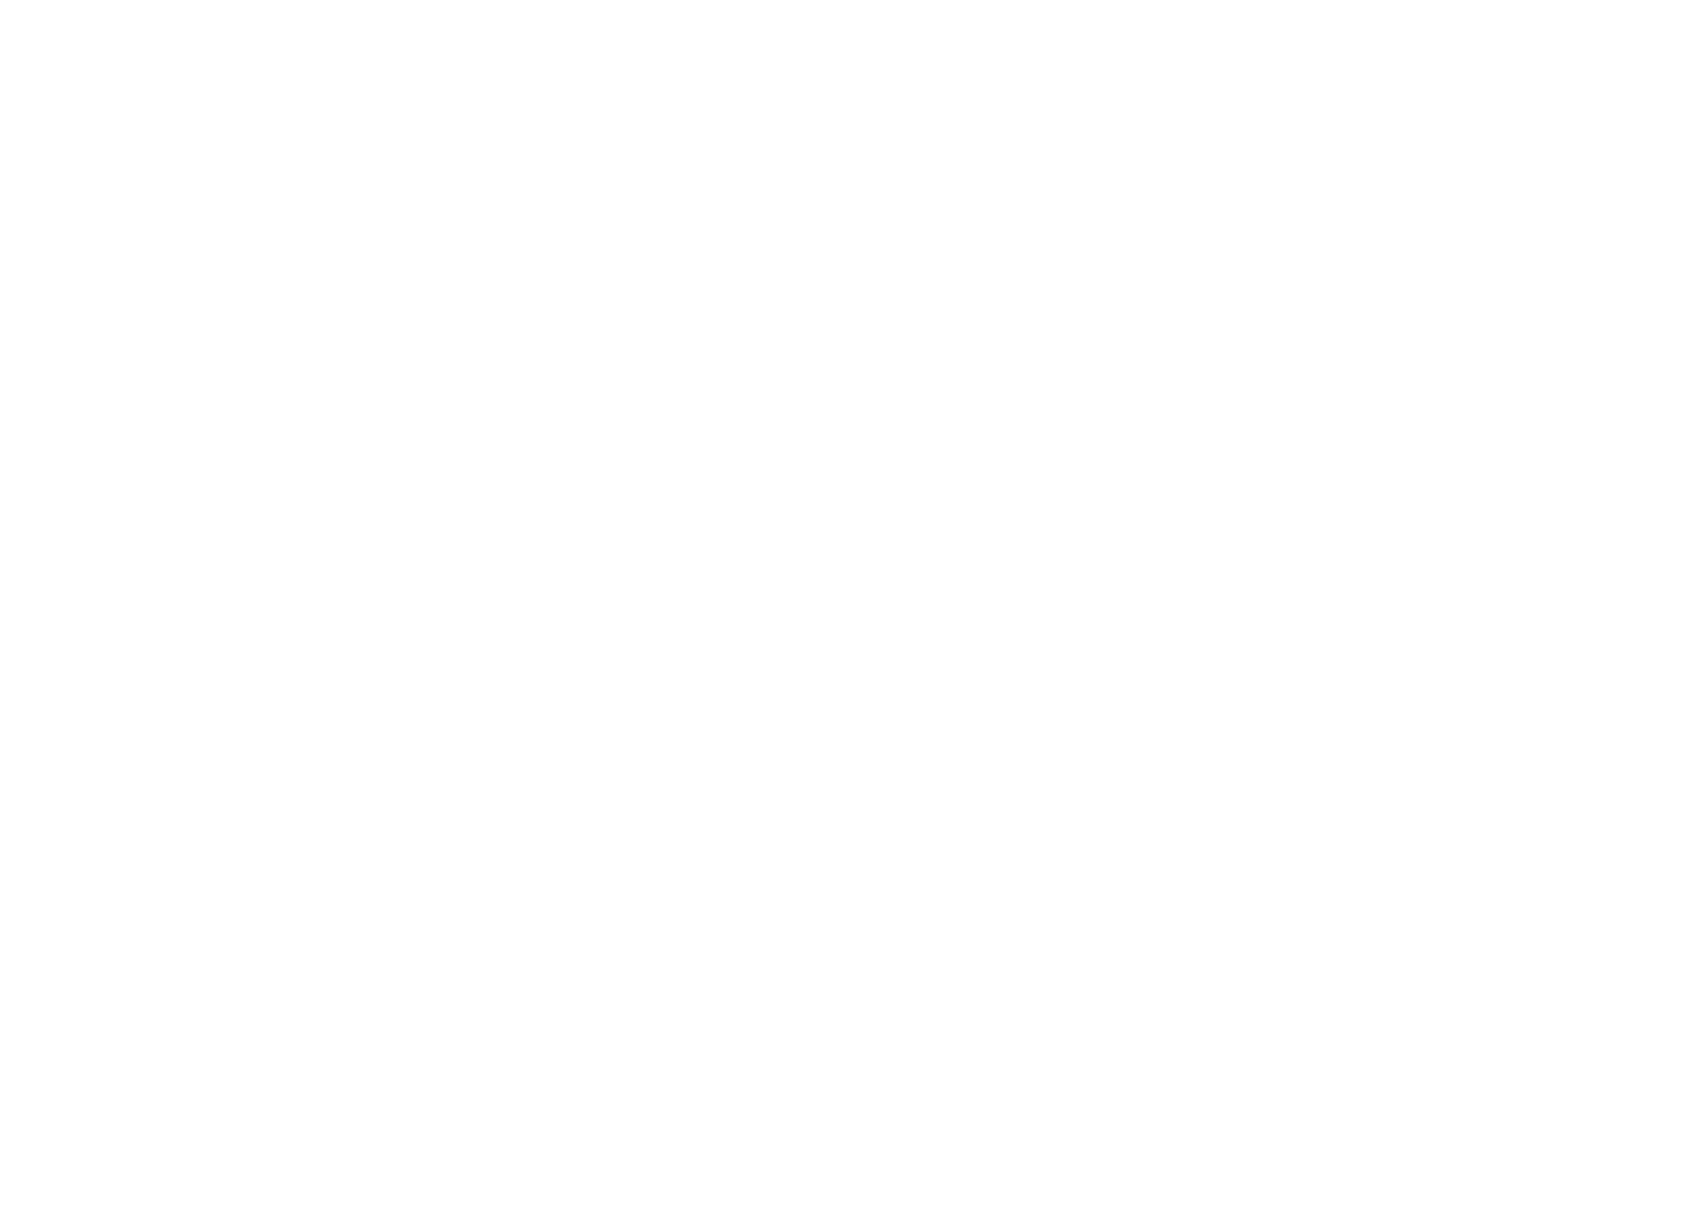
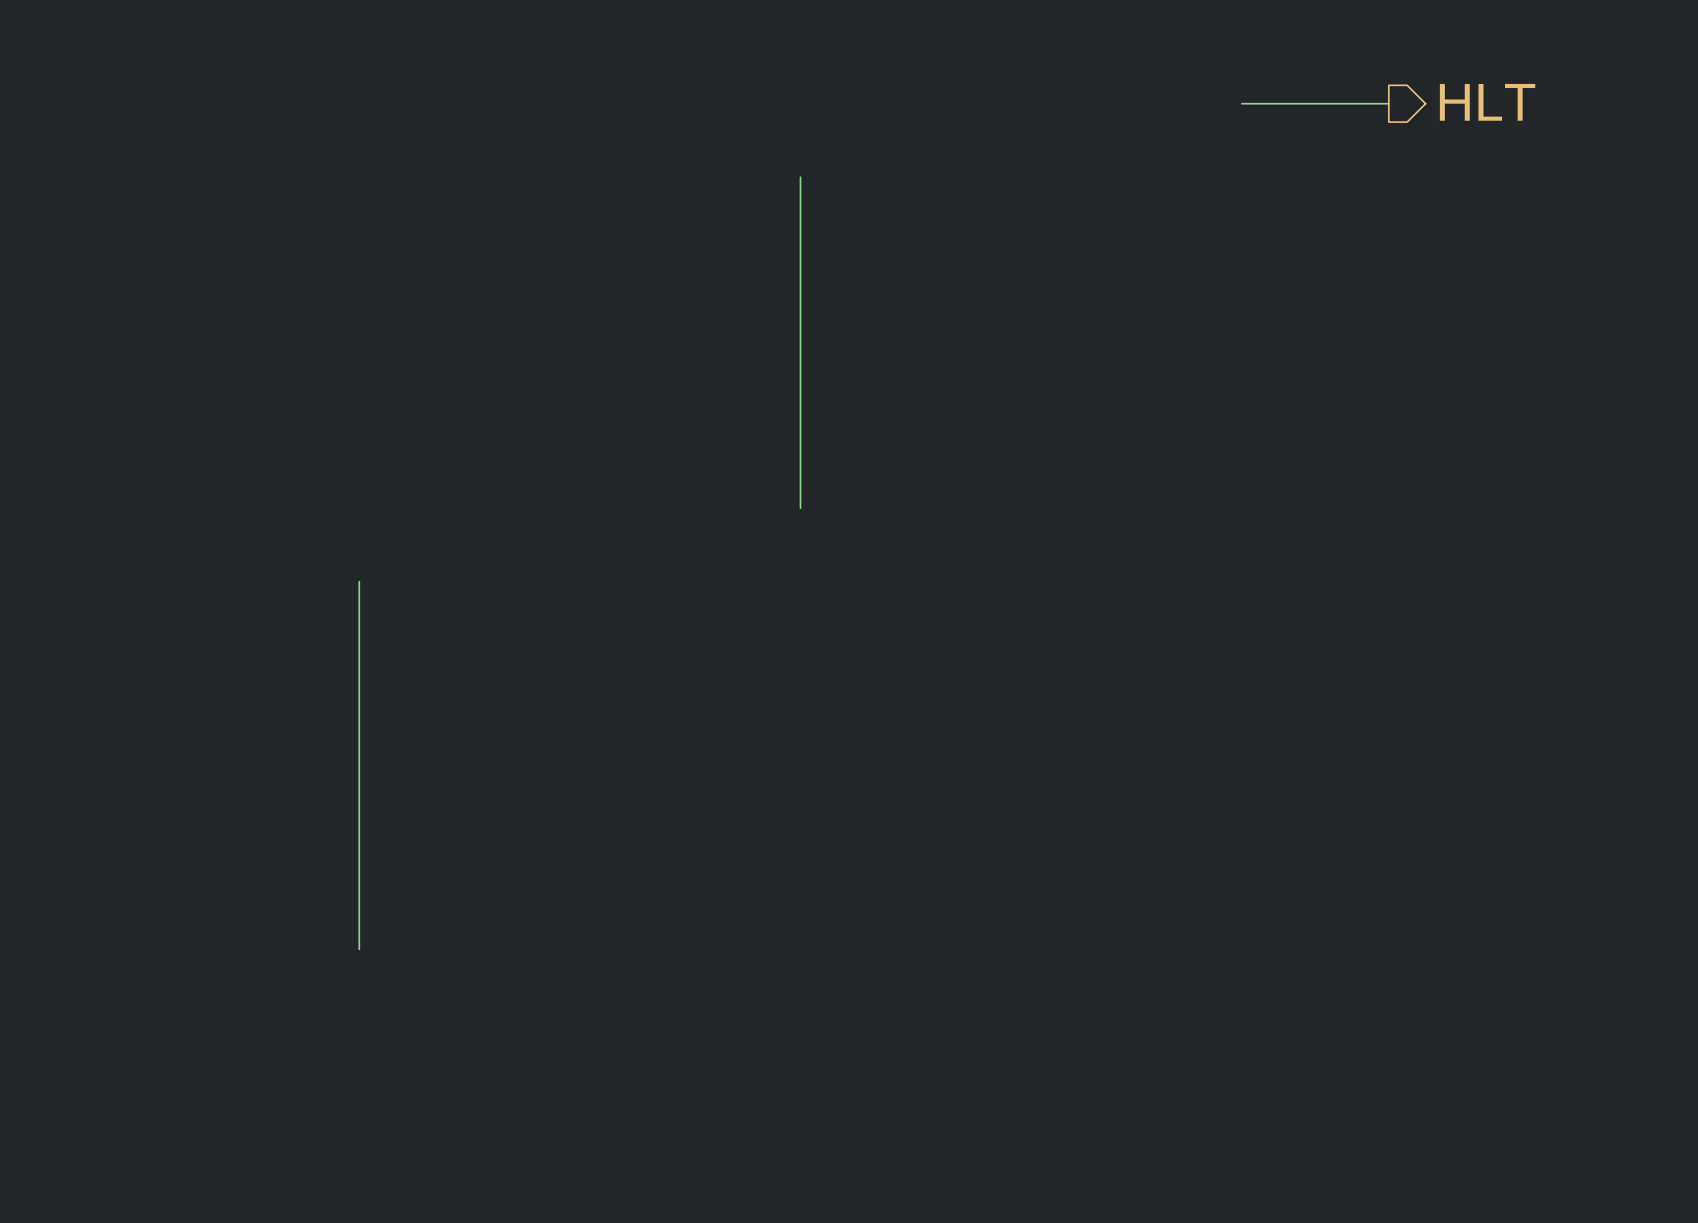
hierarchical label: none -> HLT (1487, 102)
wire: none -> (1241, 103) (1388, 103)
wire: none -> (800, 177) (800, 508)
wire: none -> (359, 581) (359, 949)

